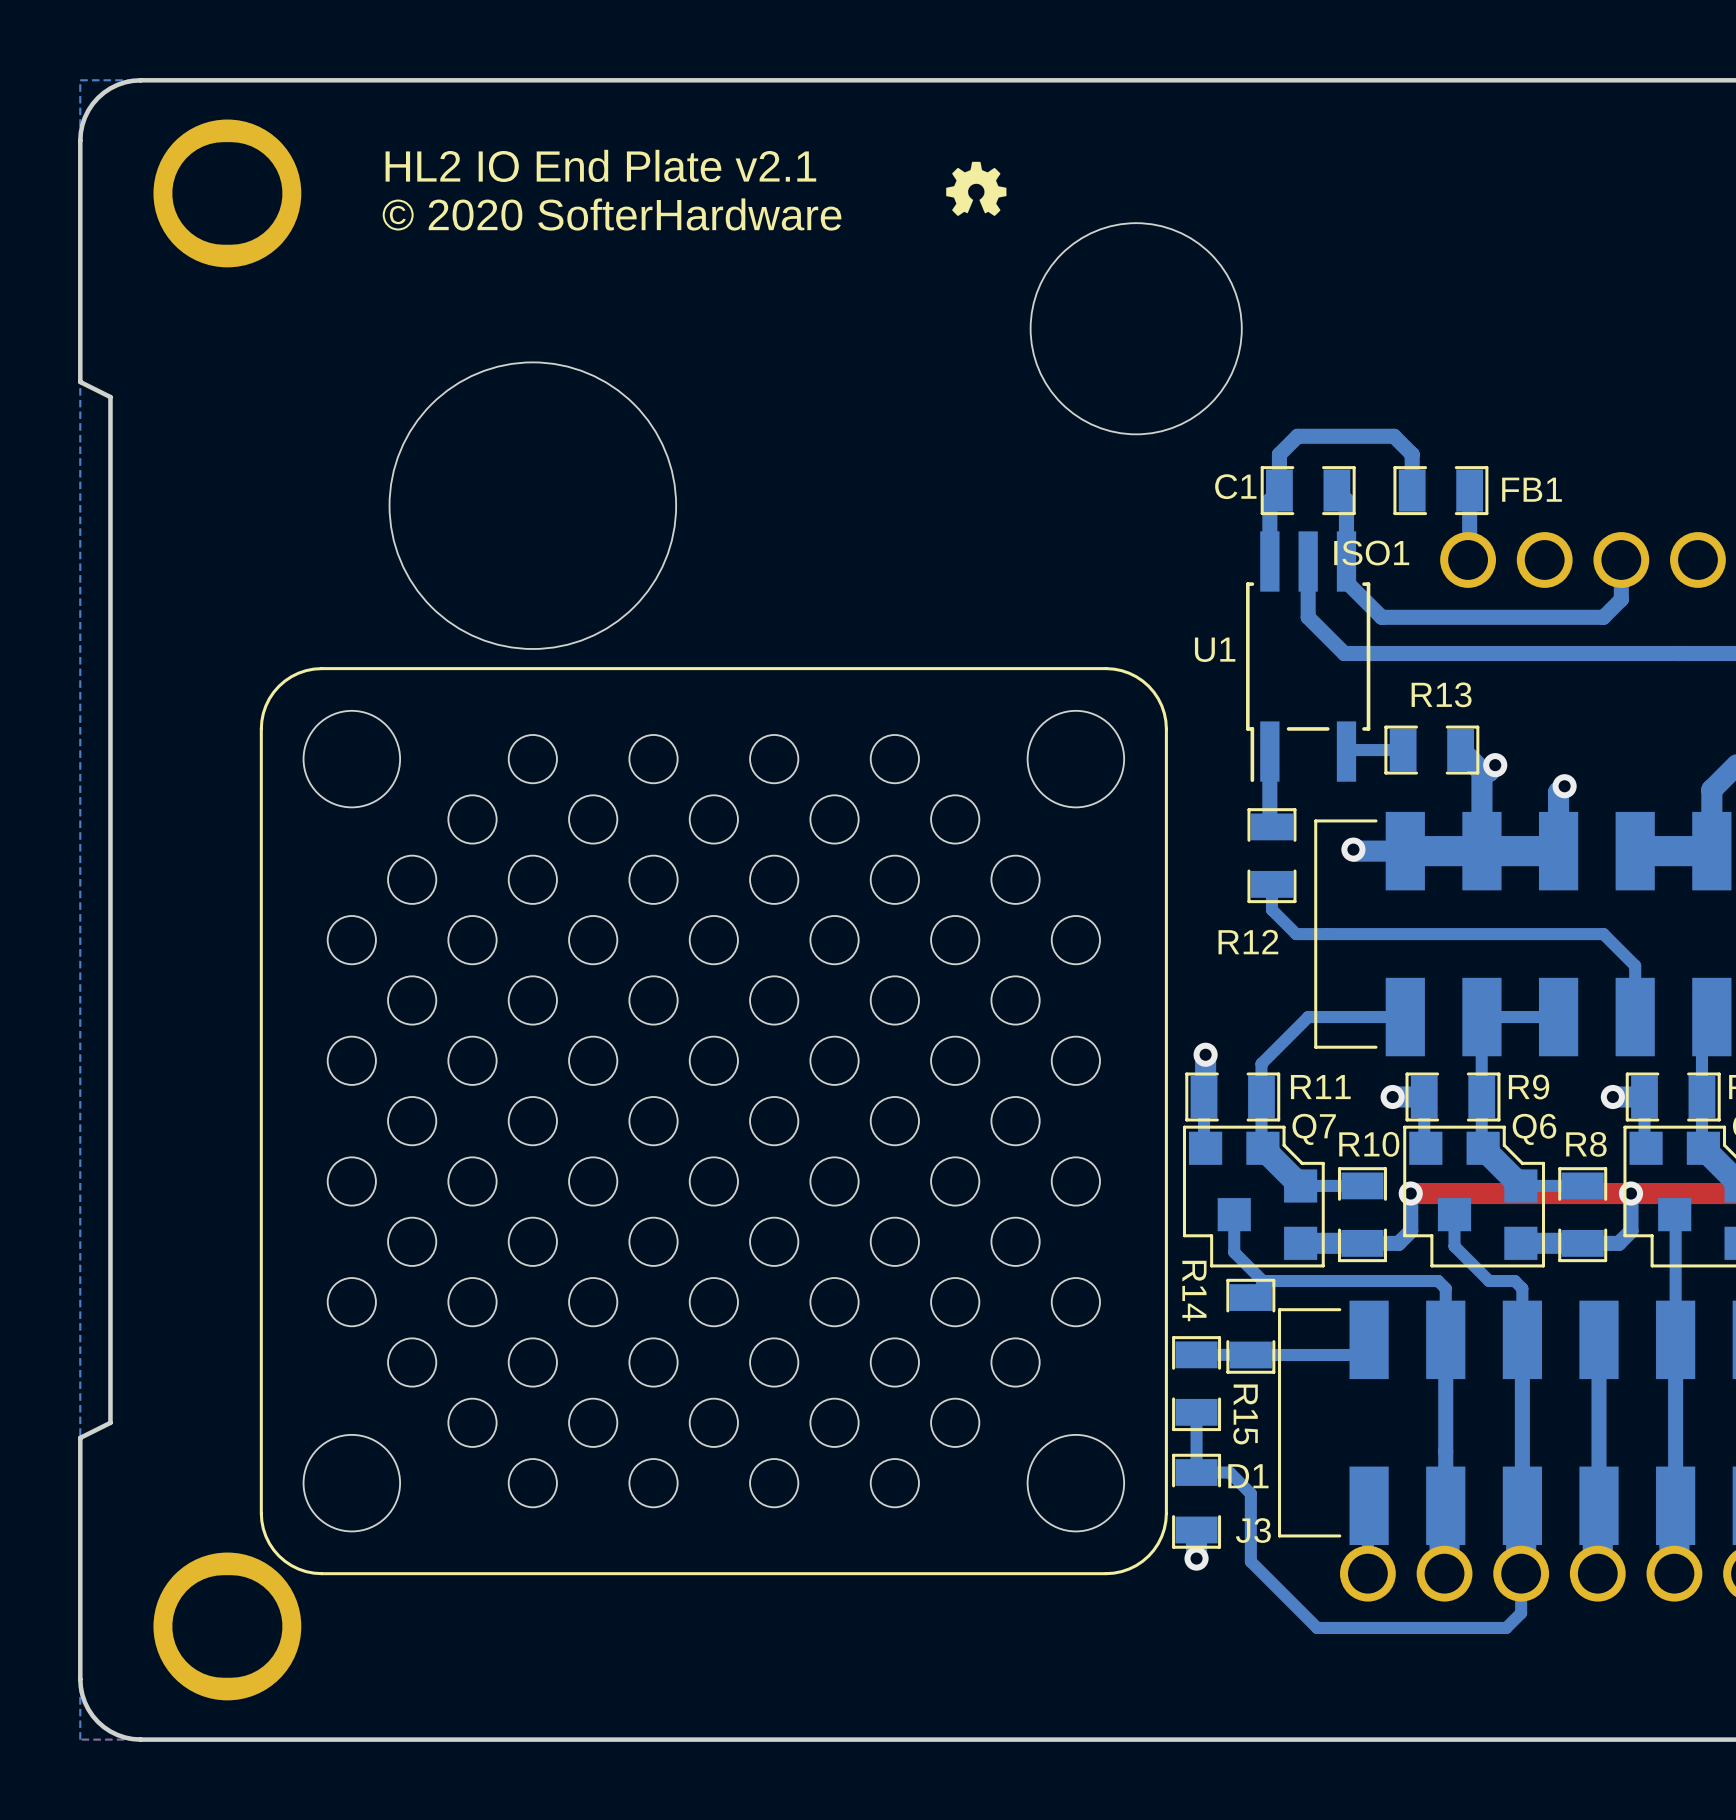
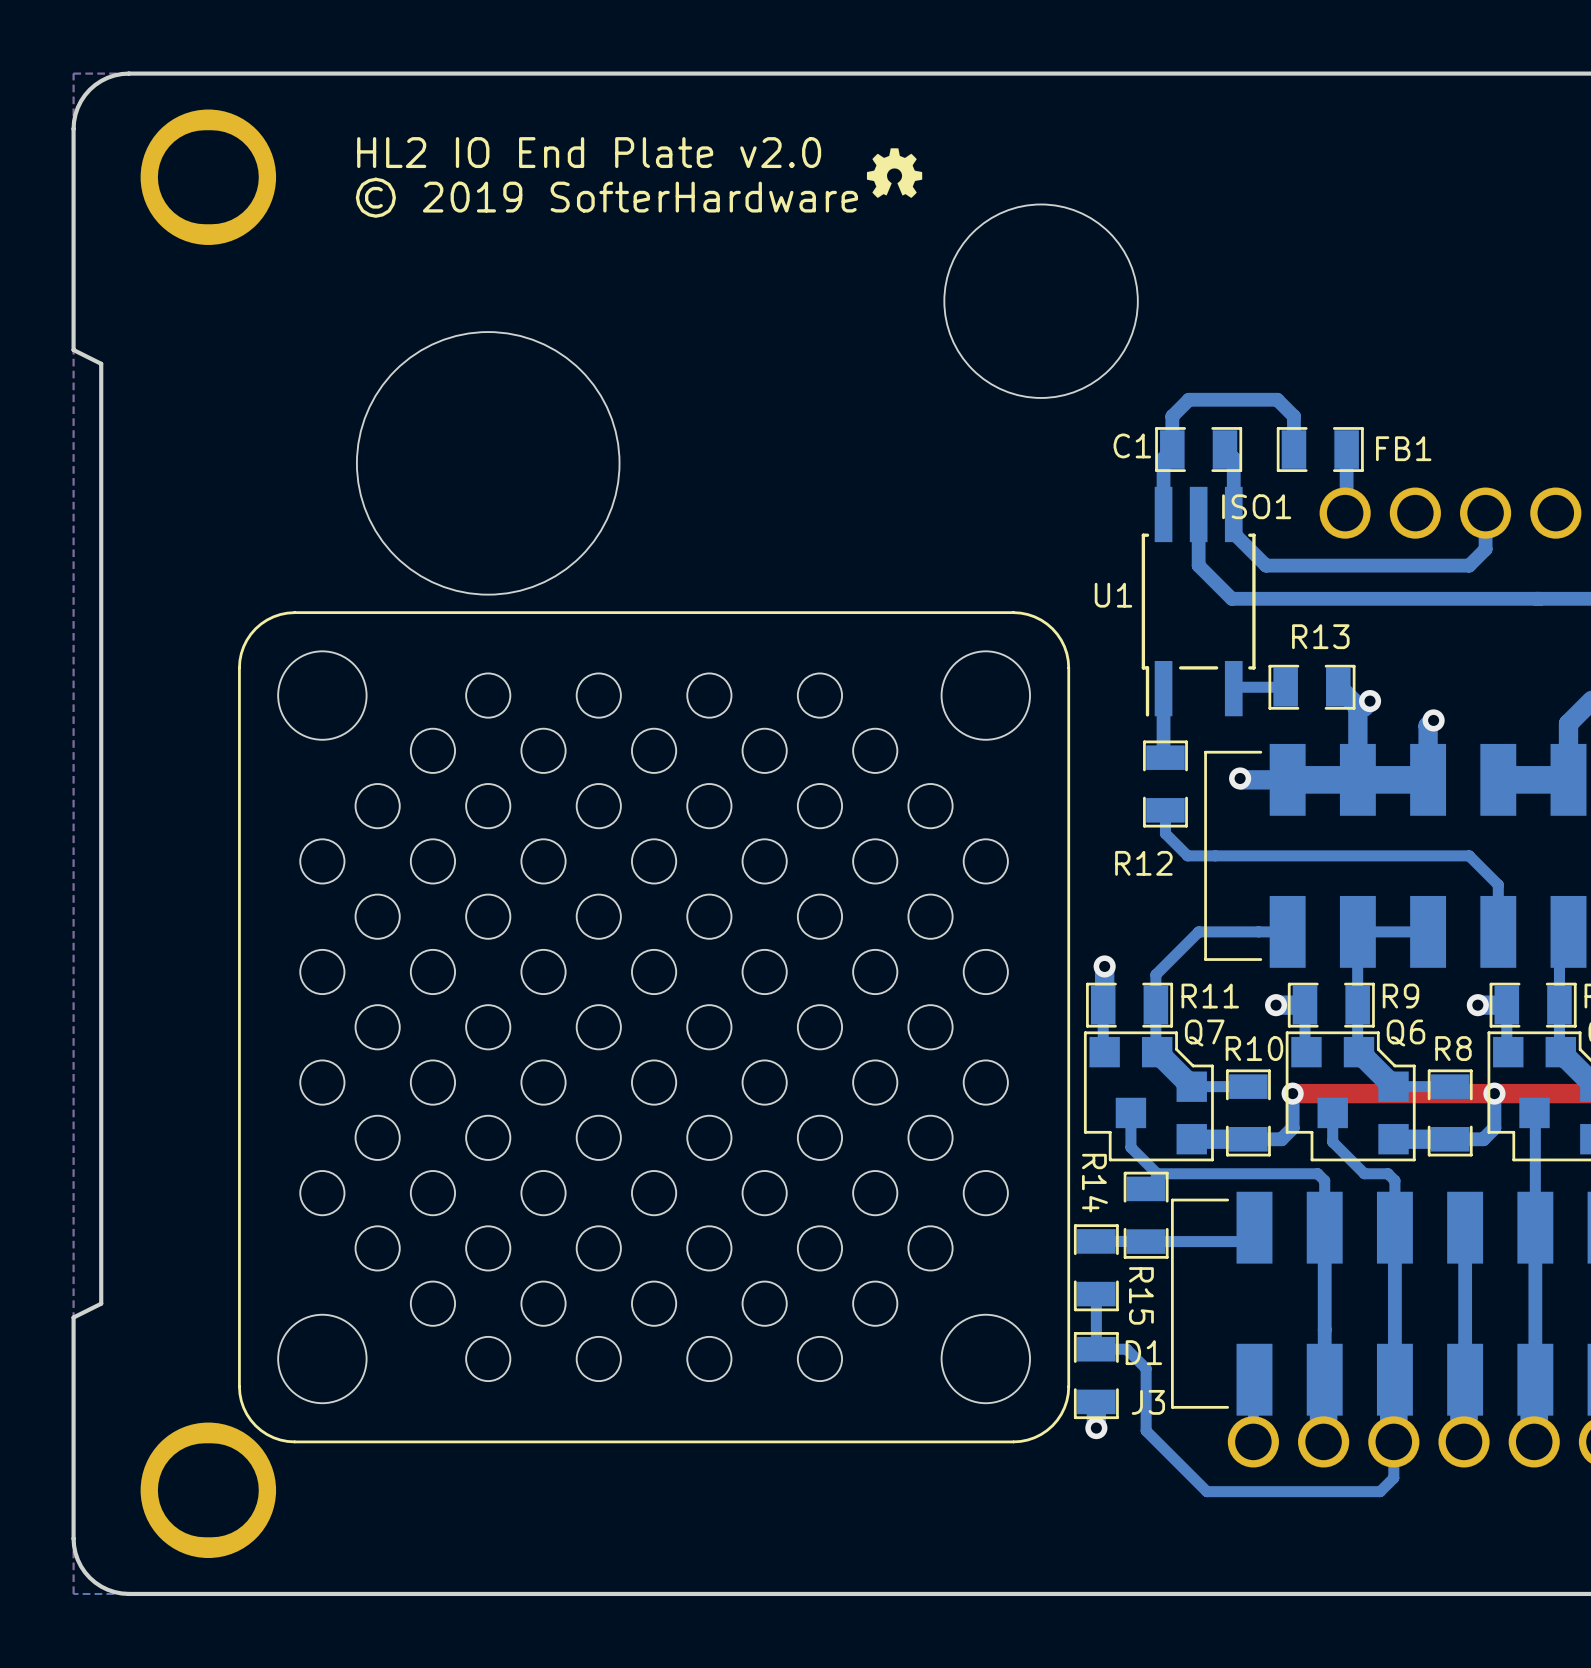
text: HL2 IO End Plate v2.1 (600, 165) -> HL2 IO End Plate v2.0 (589, 152)
text: © 2020 SofterHardware (612, 214) -> © 2019 SofterHardware (606, 197)

